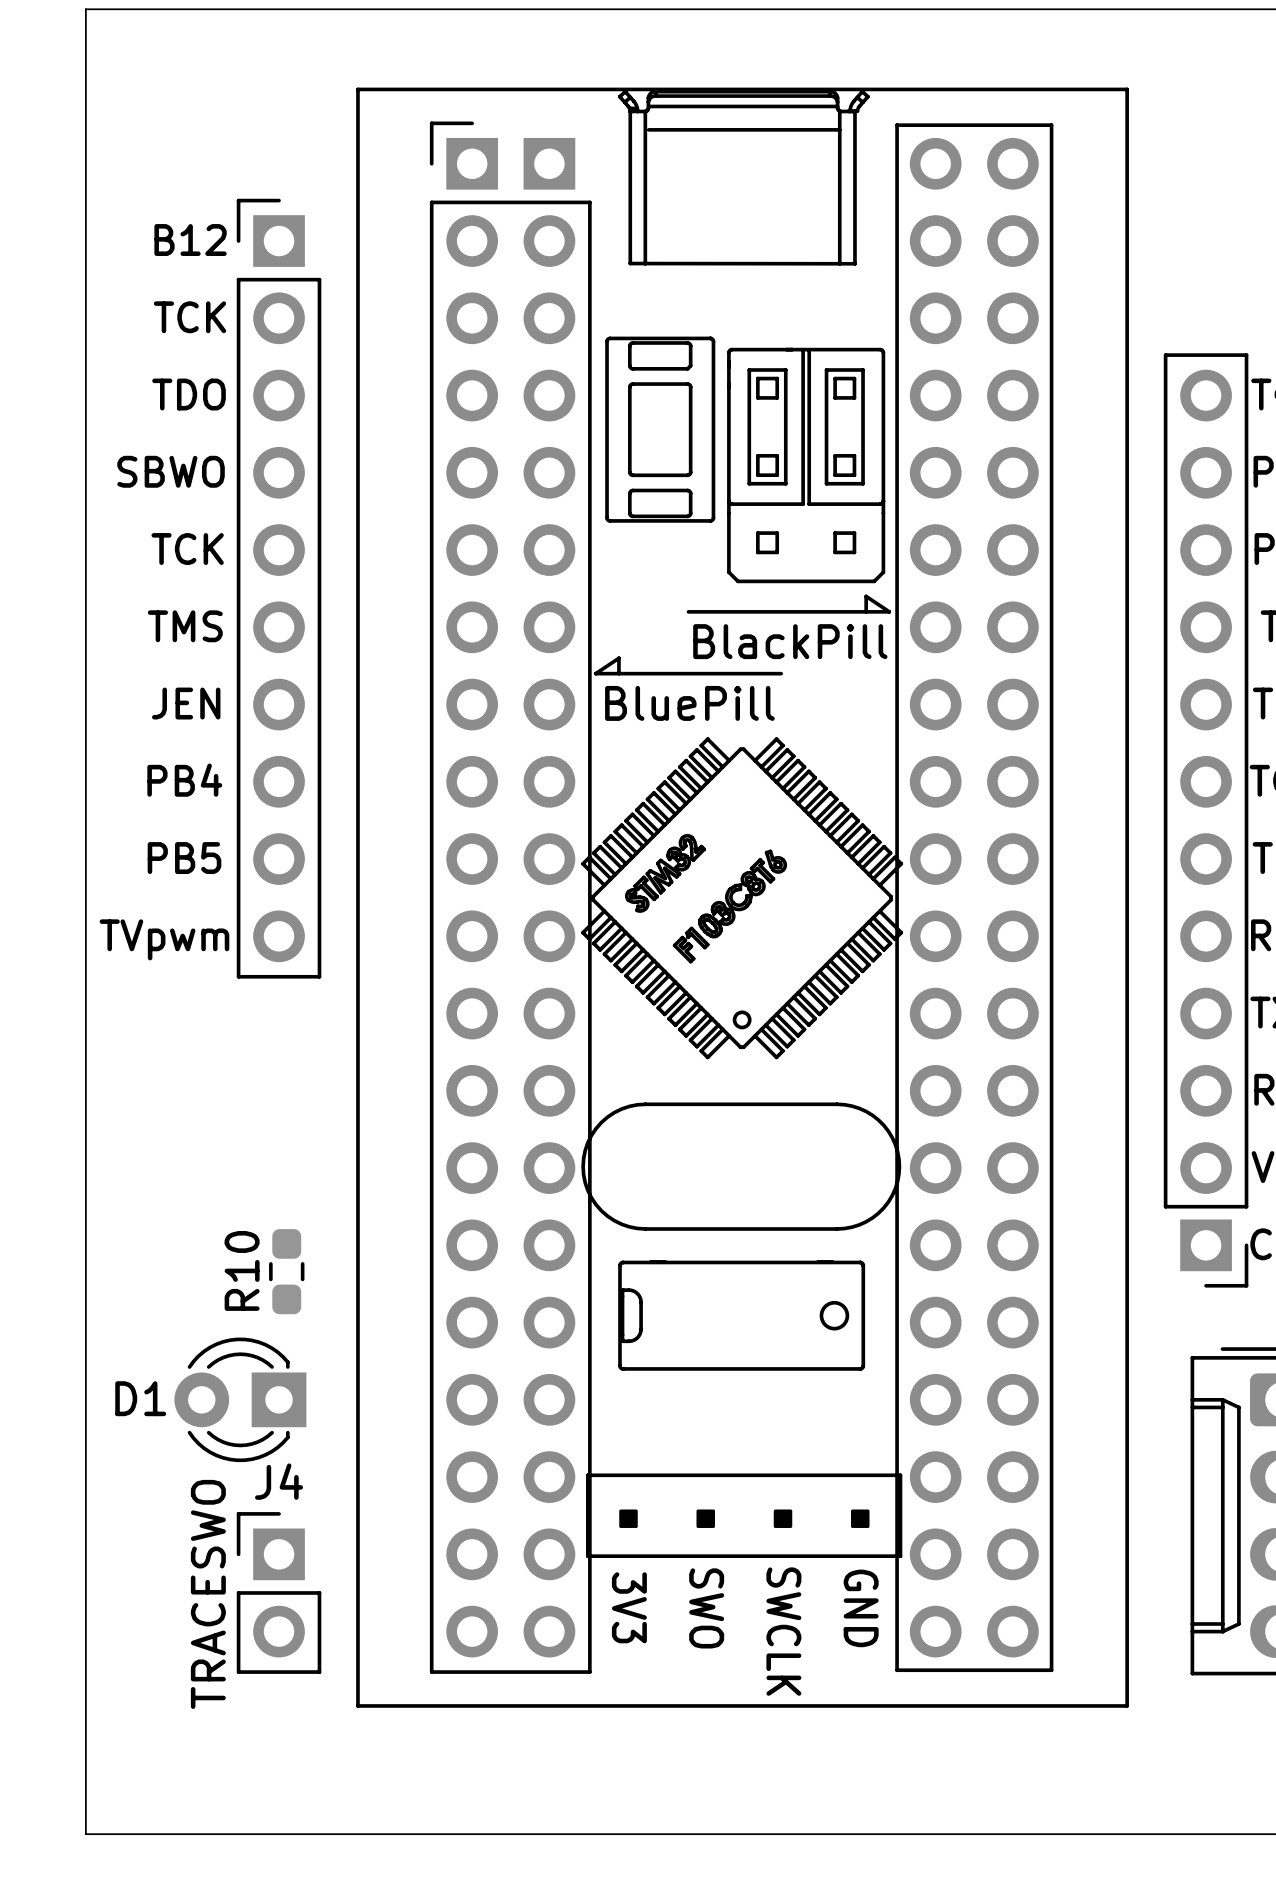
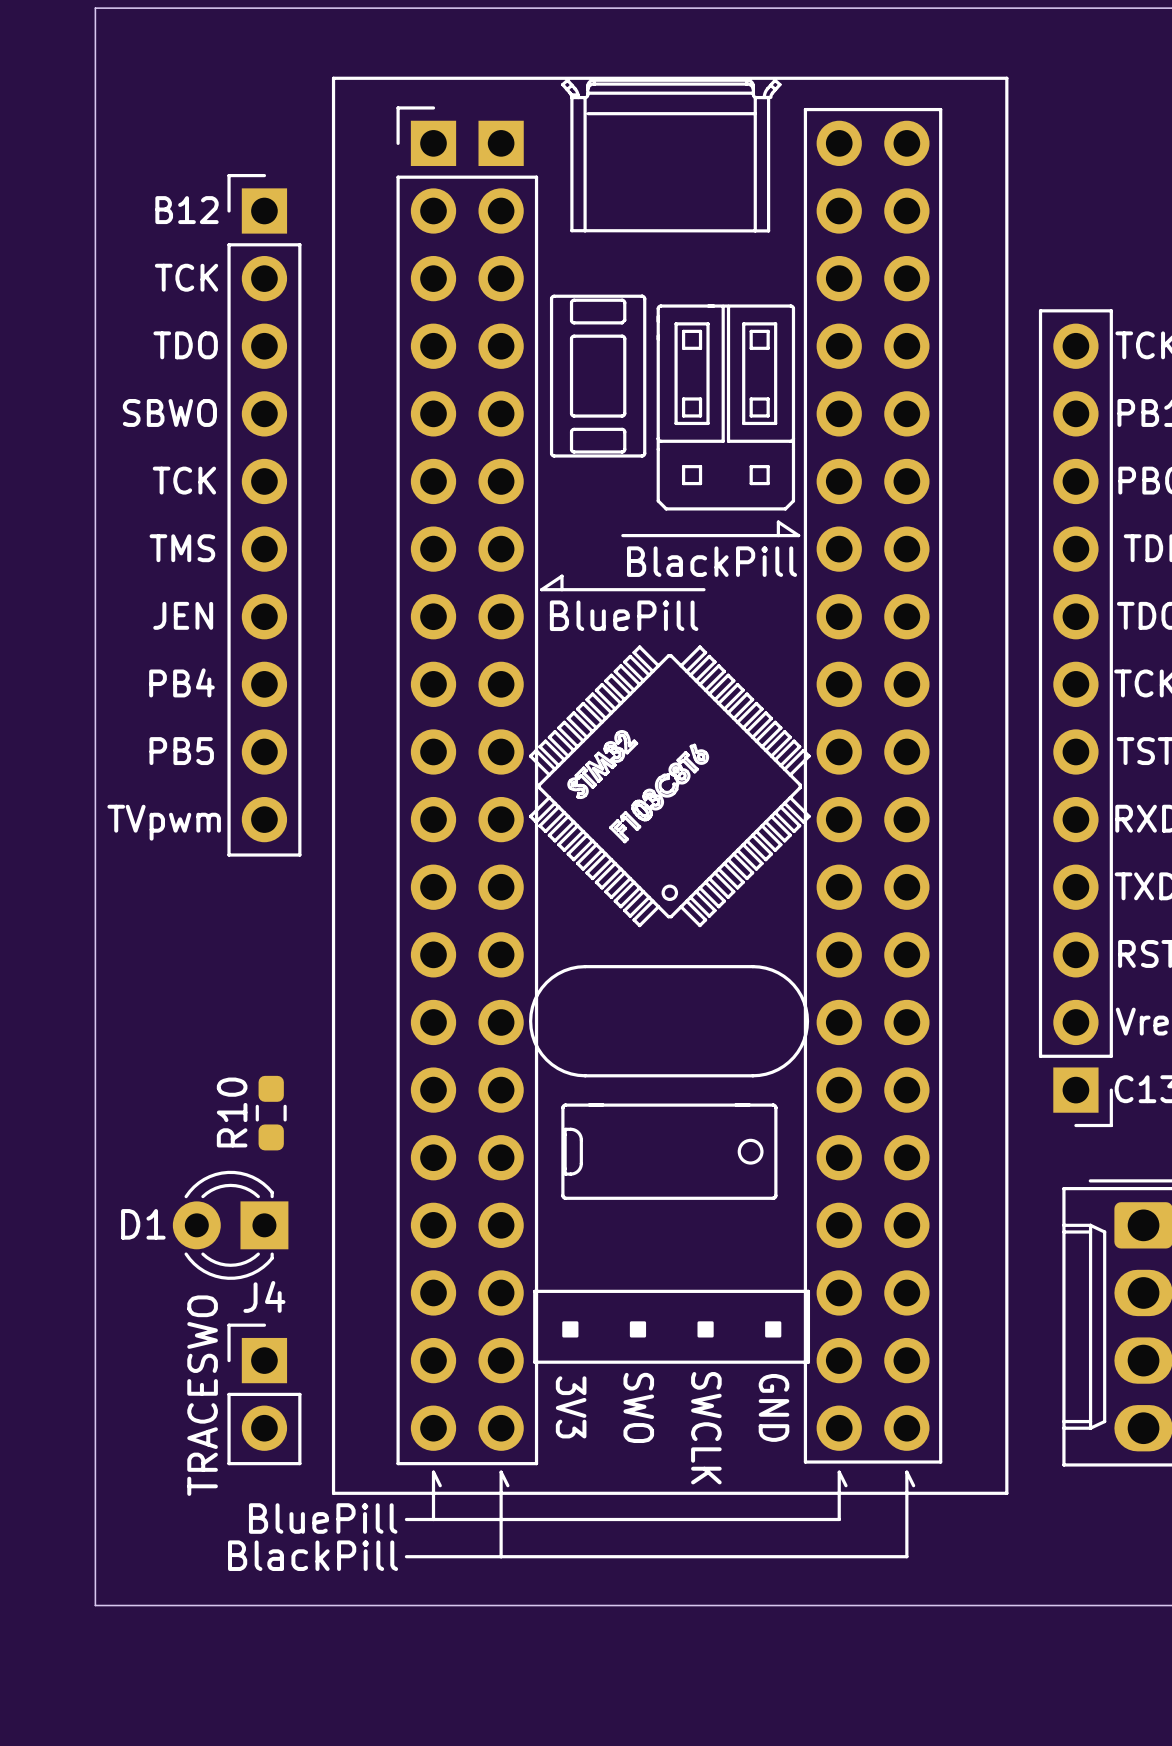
line: none -> (440, 1485) (433, 1472) (433, 1519)
line: none -> (507, 1485) (501, 1472) (501, 1556)
line: none -> (846, 1485) (839, 1472) (839, 1519) (406, 1519)
line: none -> (913, 1485) (906, 1472) (906, 1556) (406, 1556)
text: none -> BluePill (323, 1518)
text: none -> BlackPill (313, 1555)

